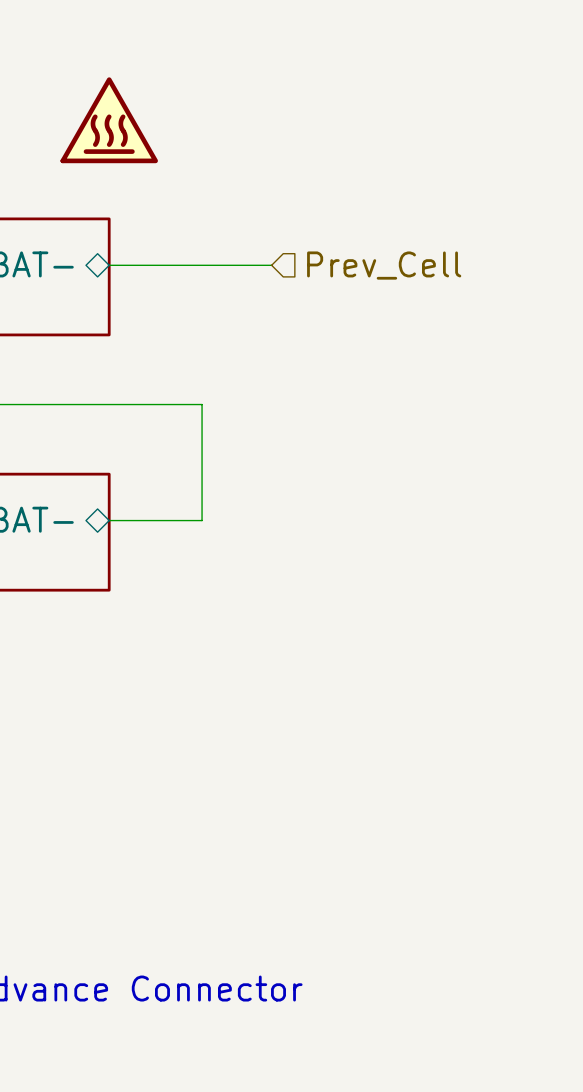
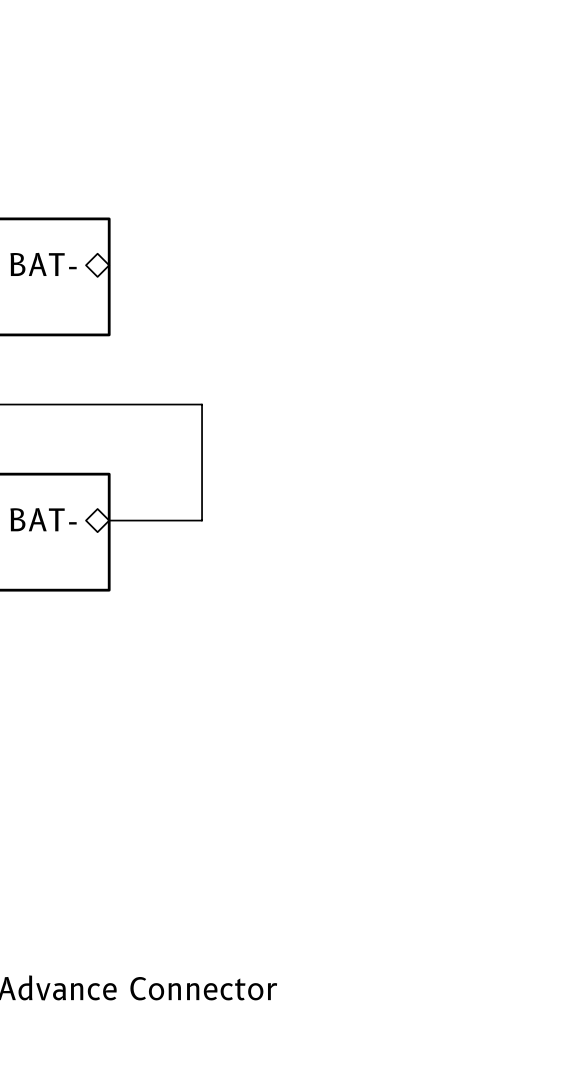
power symbol: (109, 120) -> none
wire: (109, 265) (271, 265) -> none
hierarchical label: Prev_Cell (384, 265) -> none

